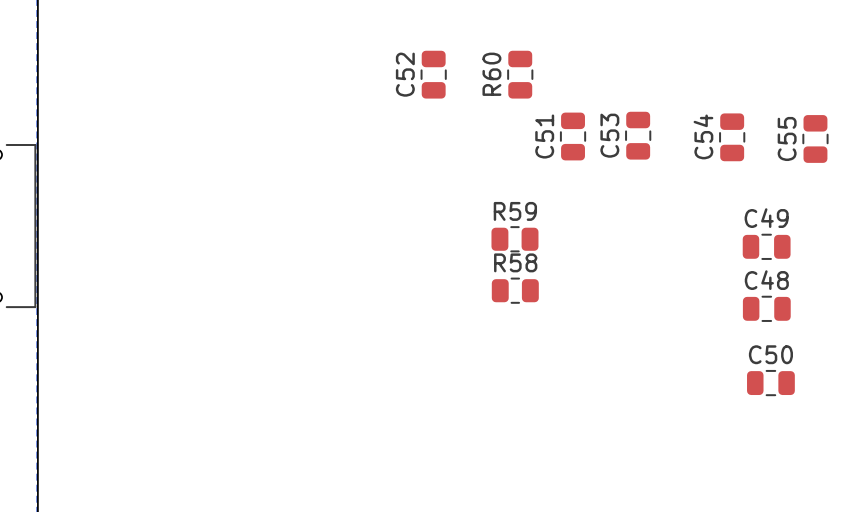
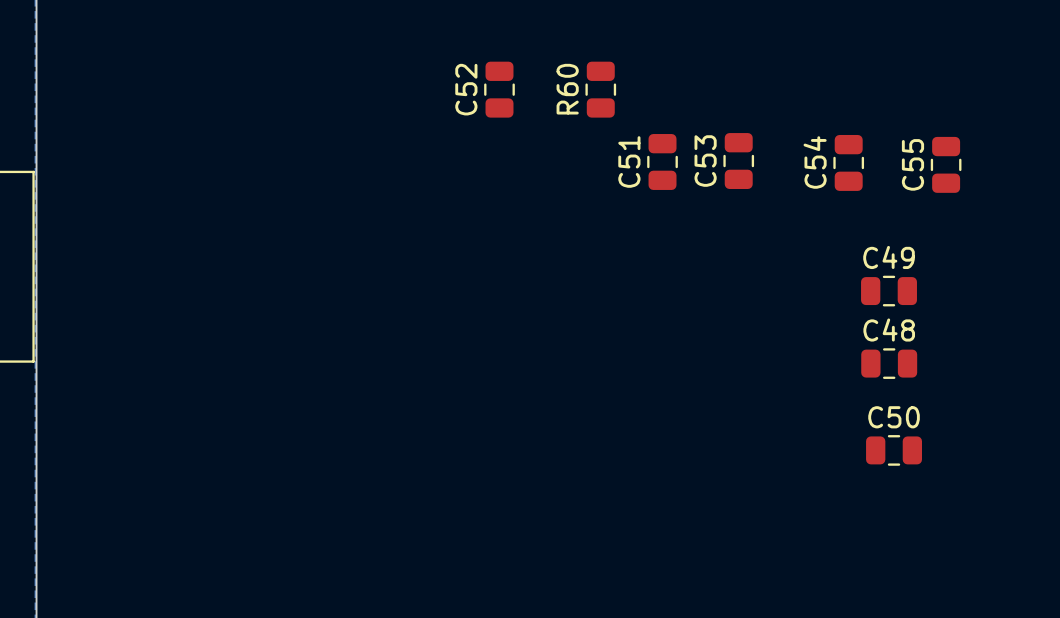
R59: (514, 239) -> none
R58: (515, 290) -> none

